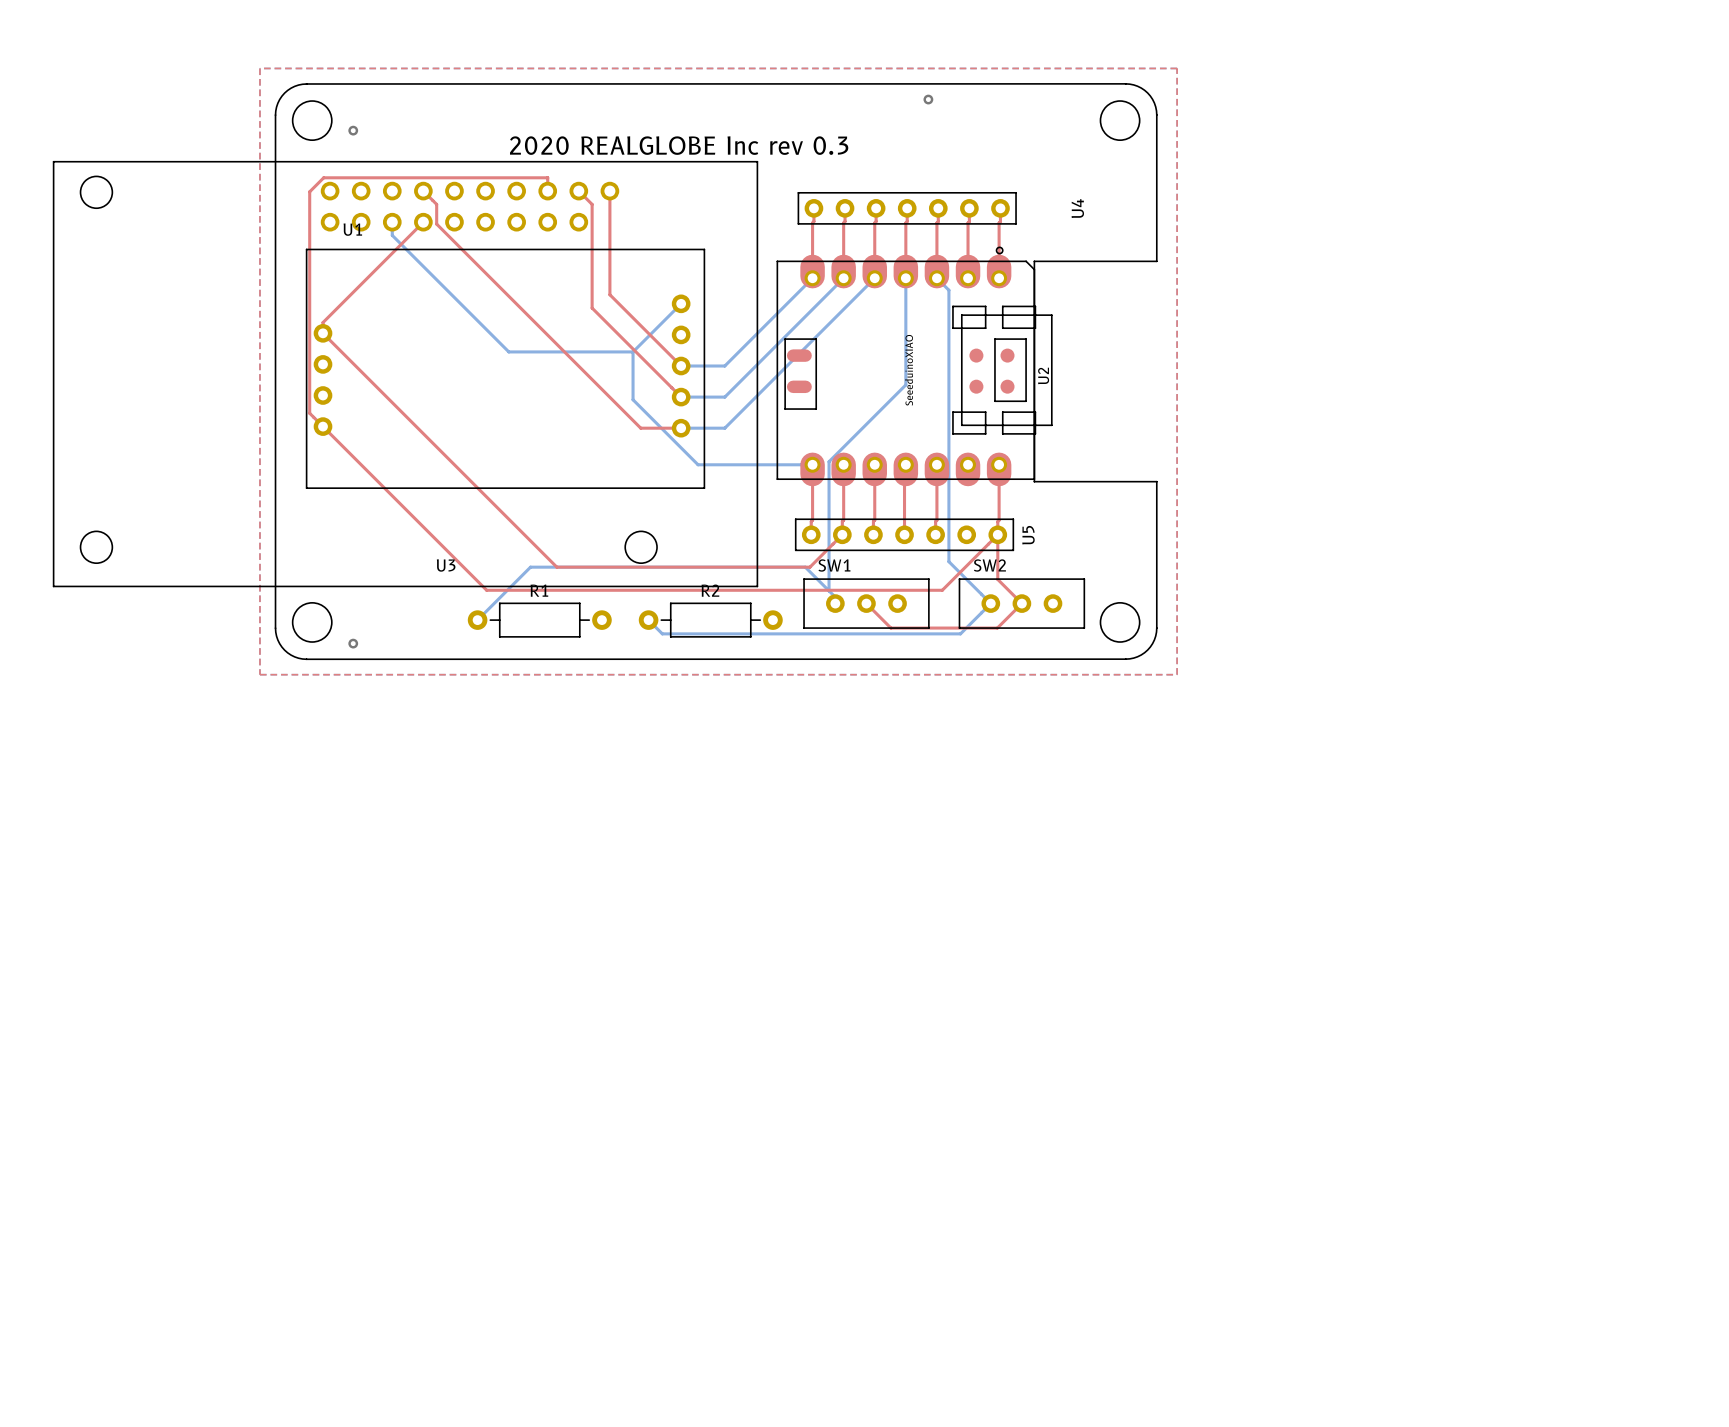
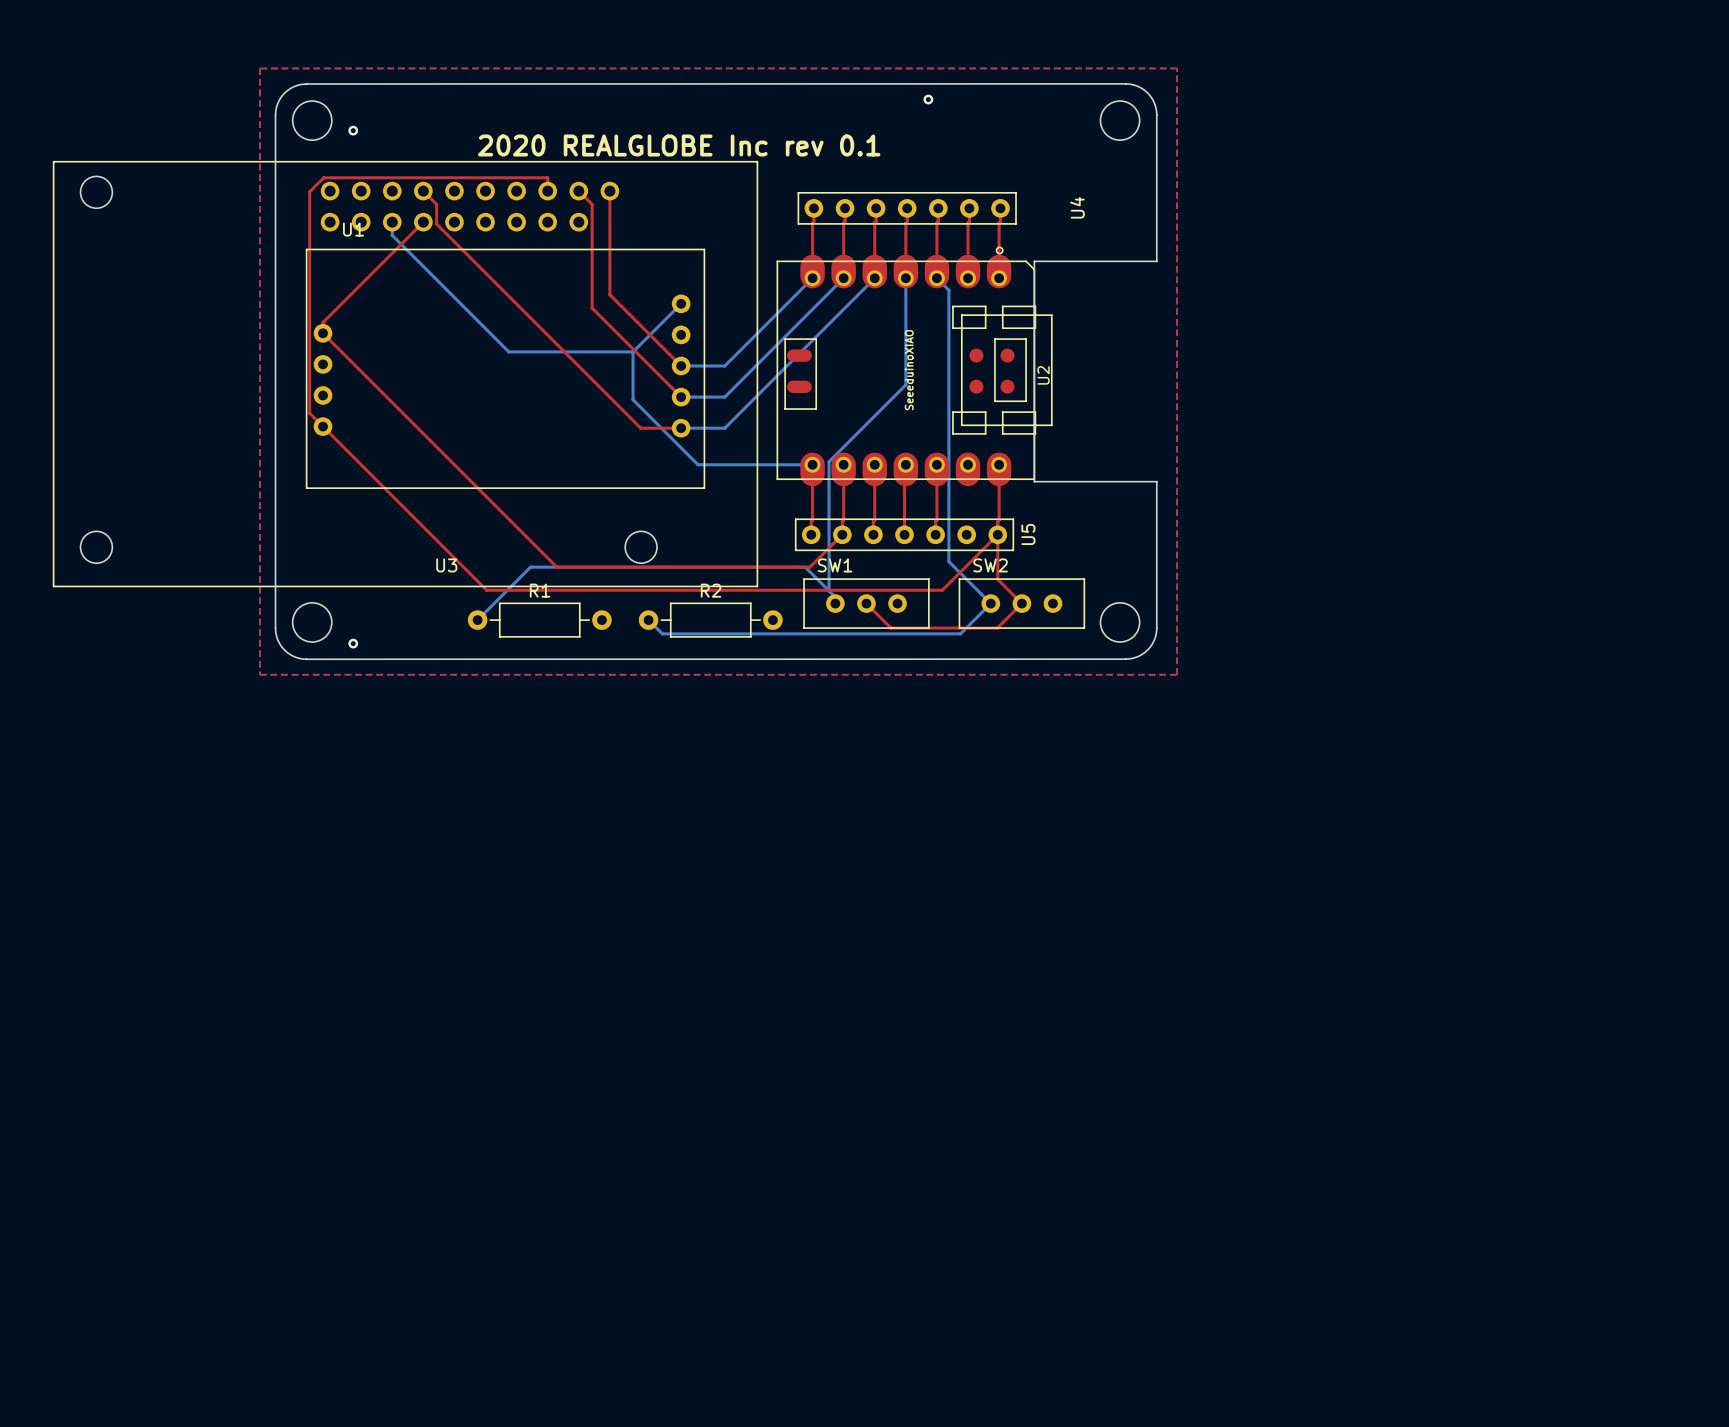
text: 2020 REALGLOBE Inc rev 0.3 (679, 145) -> 2020 REALGLOBE Inc rev 0.1 (679, 145)

